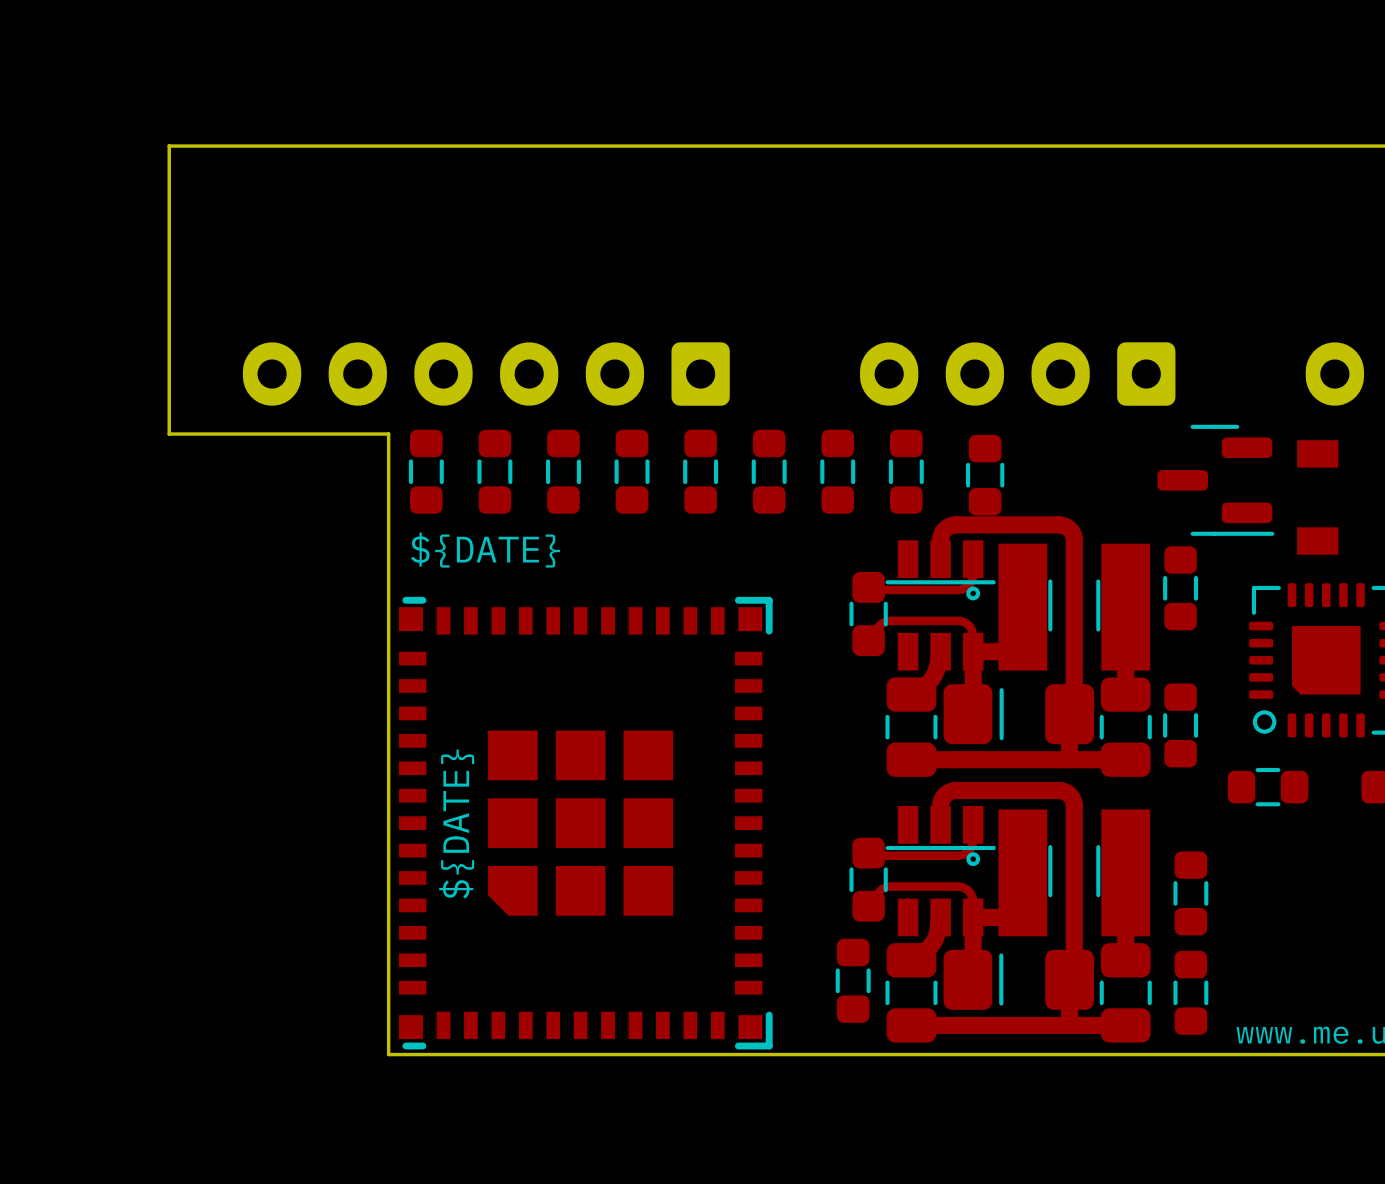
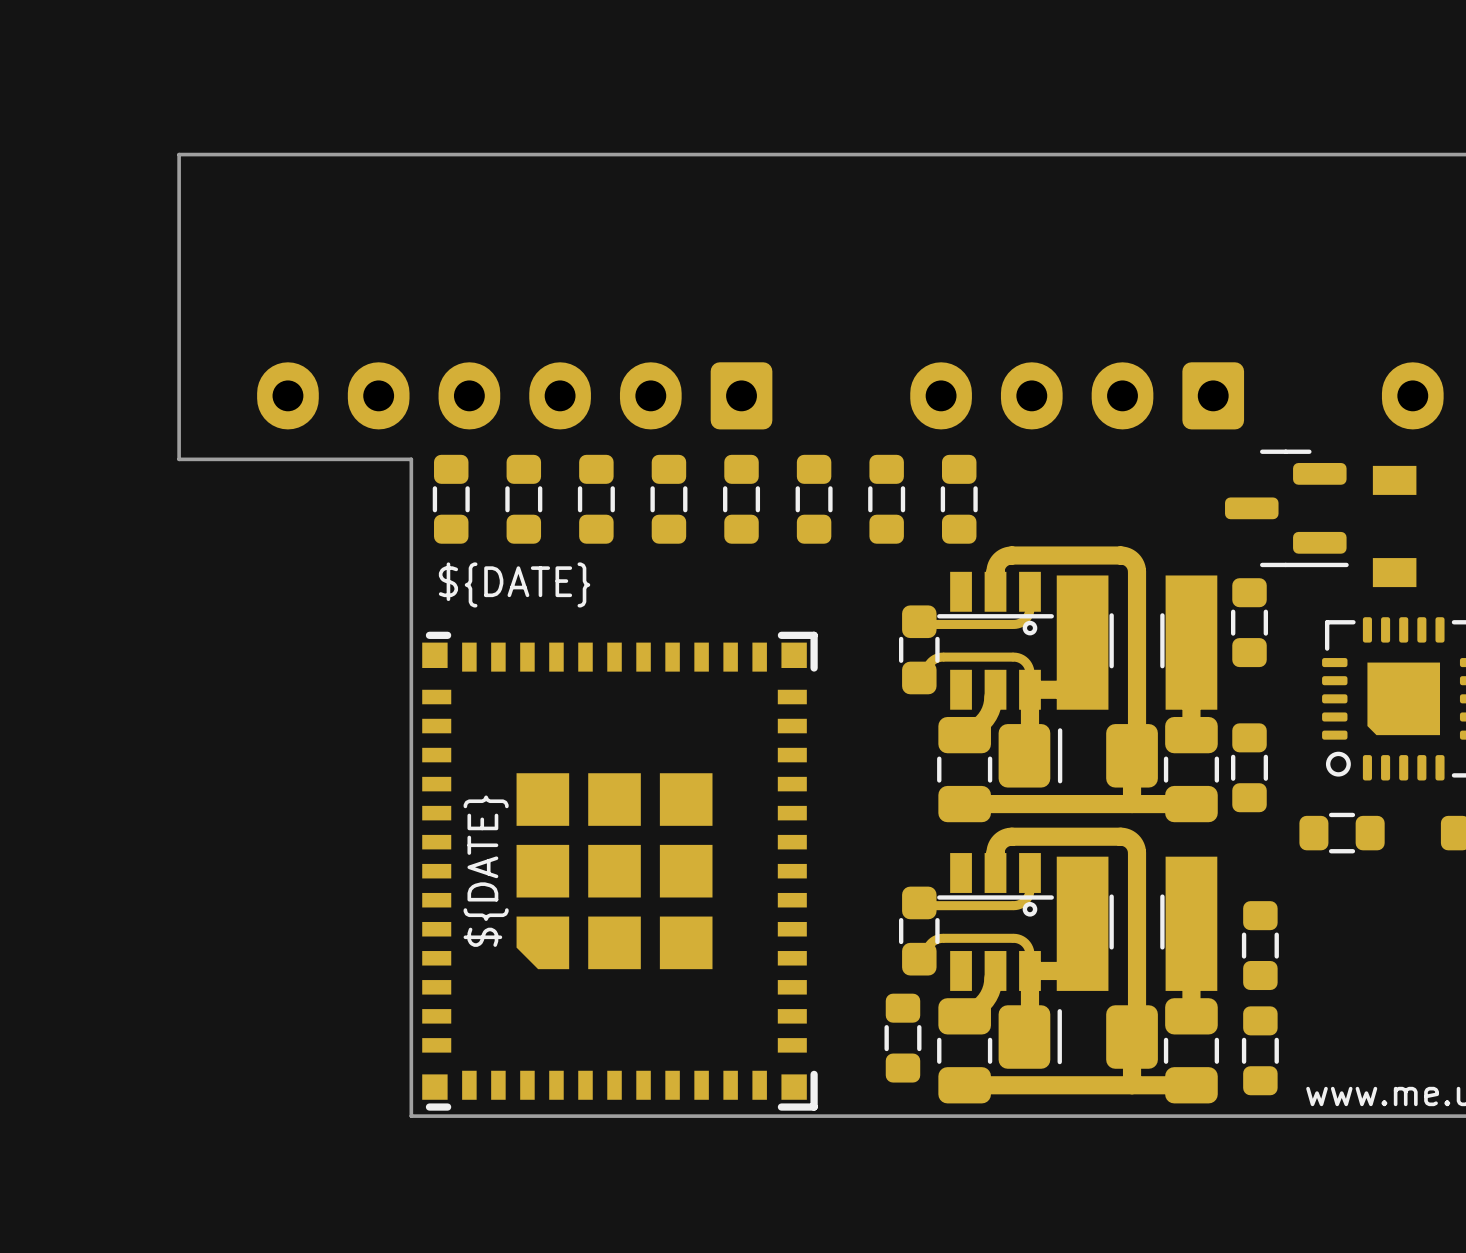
part: (985, 475) -> none

